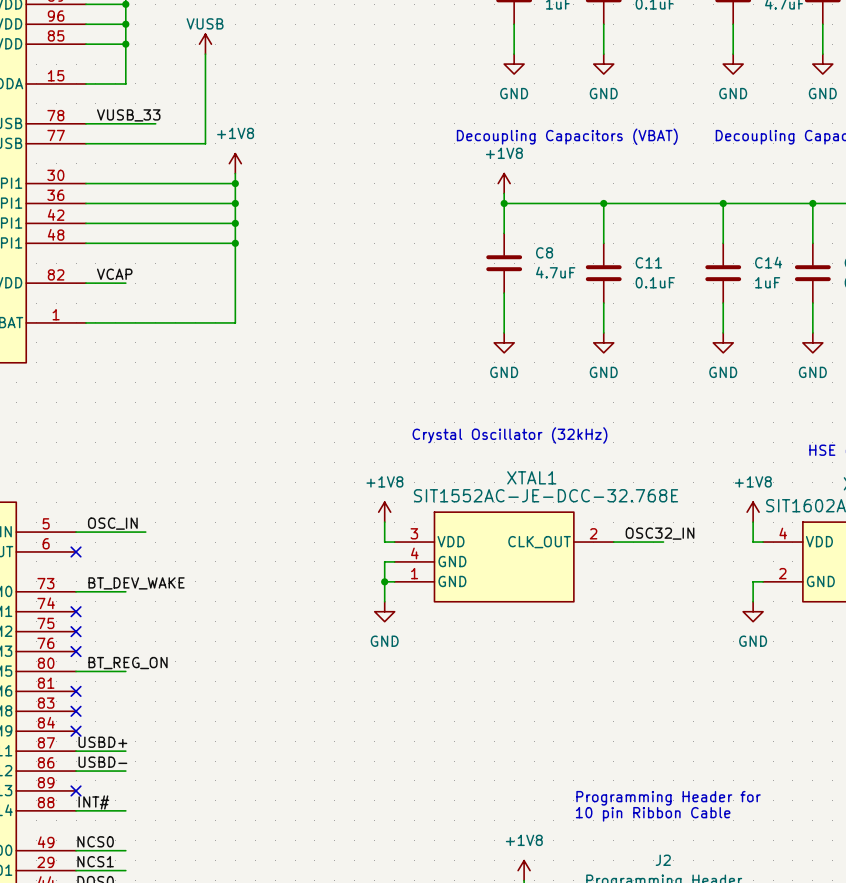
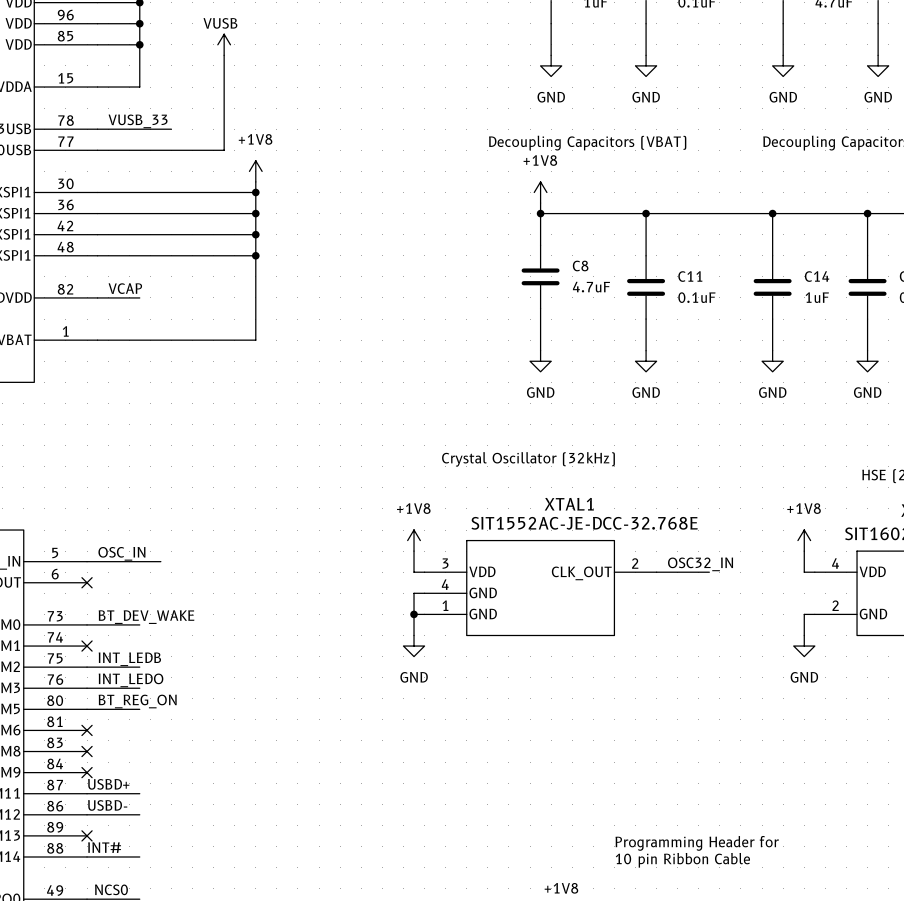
label: none -> INT_LEDB (129, 659)
wire: none -> (87, 667) (139, 667)
no-connect mark: (76, 631) -> none
label: none -> INT_LEDO (131, 680)
wire: none -> (87, 688) (139, 688)
no-connect mark: (76, 651) -> none

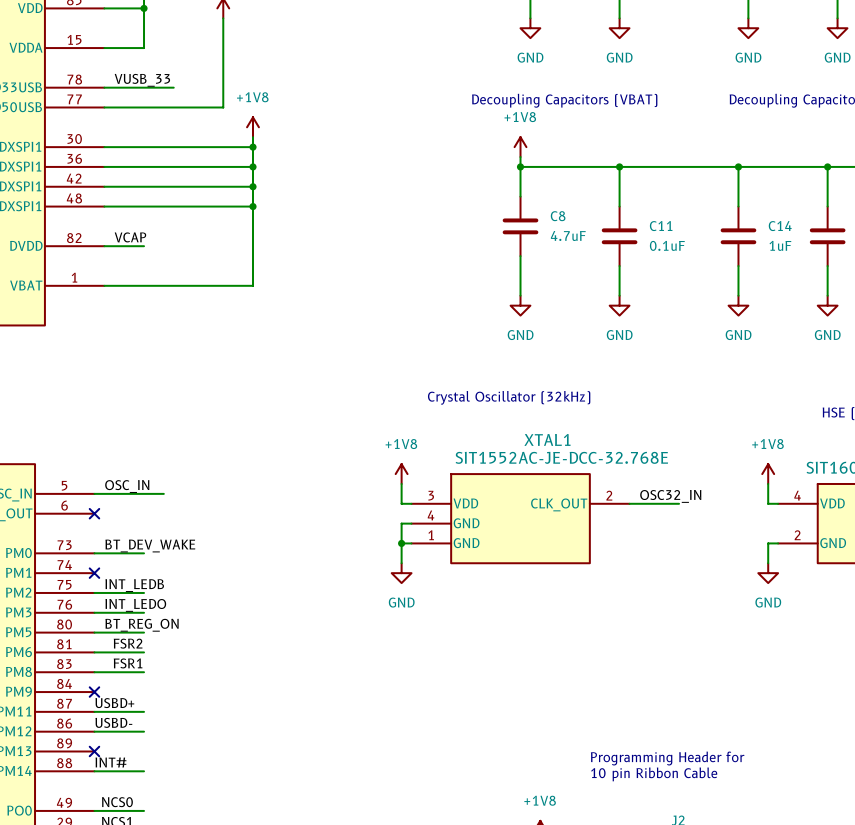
label: none -> FSR2 (128, 643)
wire: none -> (94, 652) (144, 652)
no-connect mark: (87, 730) -> none
label: none -> FSR1 (128, 663)
wire: none -> (94, 672) (144, 672)
no-connect mark: (87, 751) -> none

